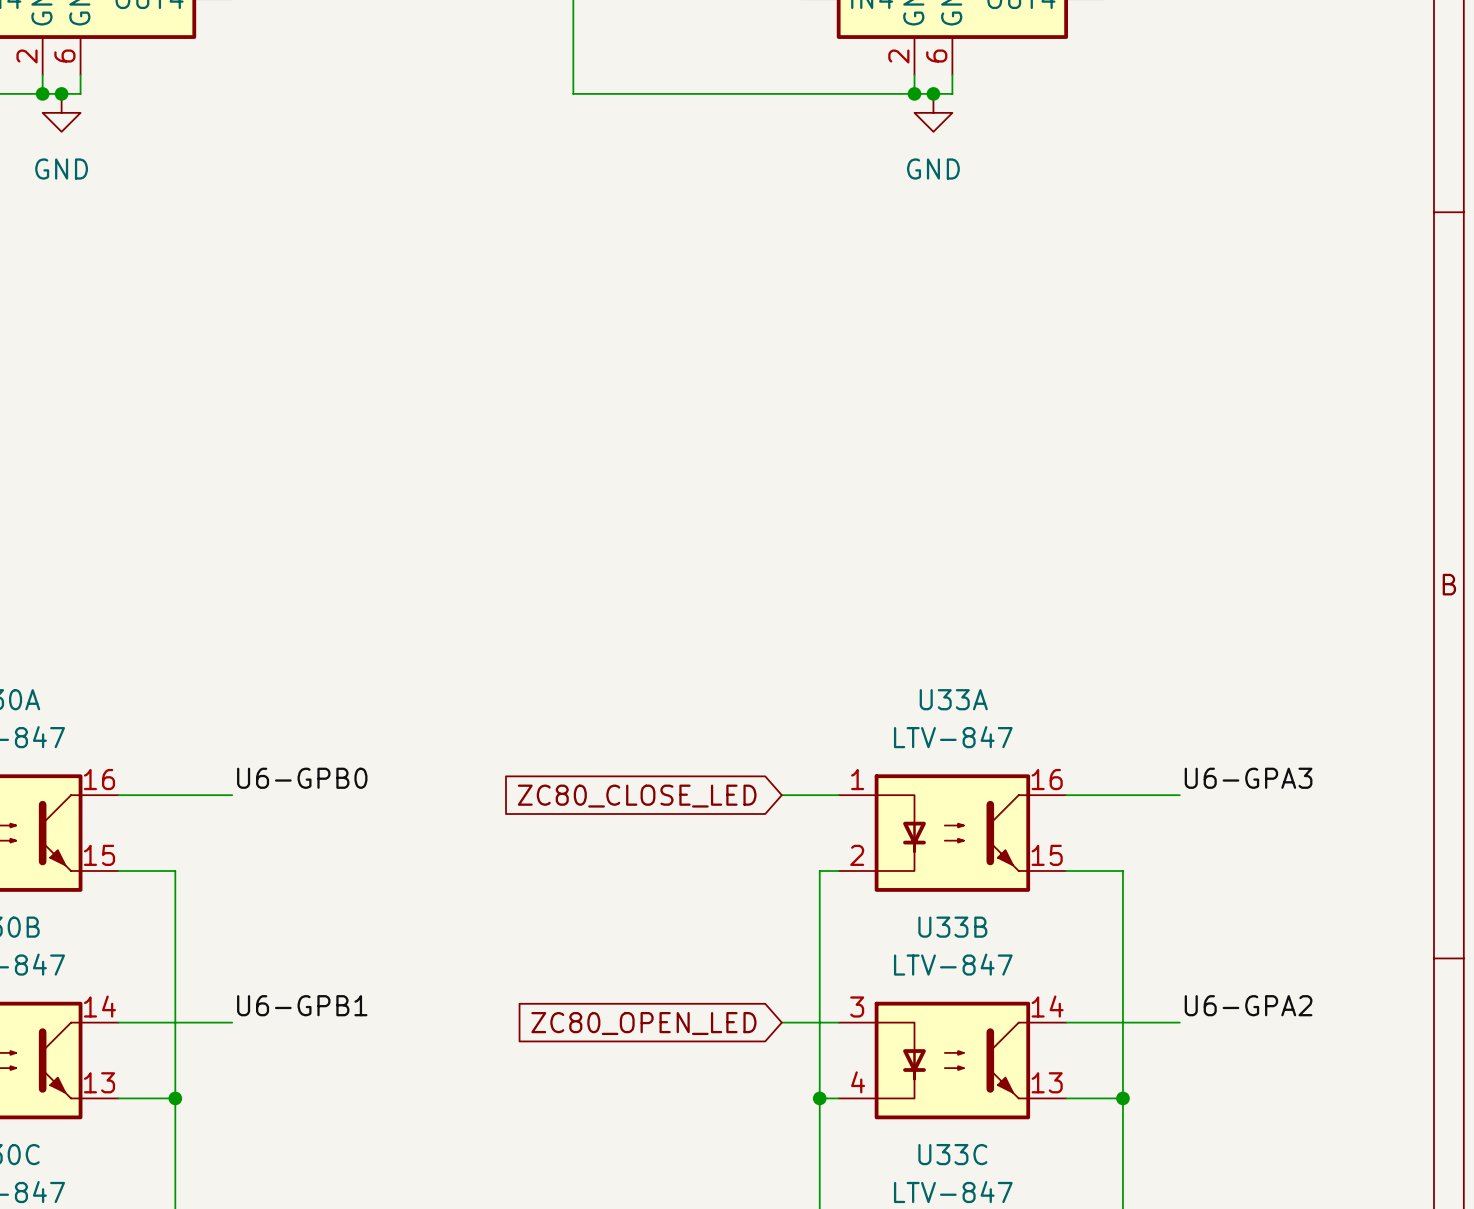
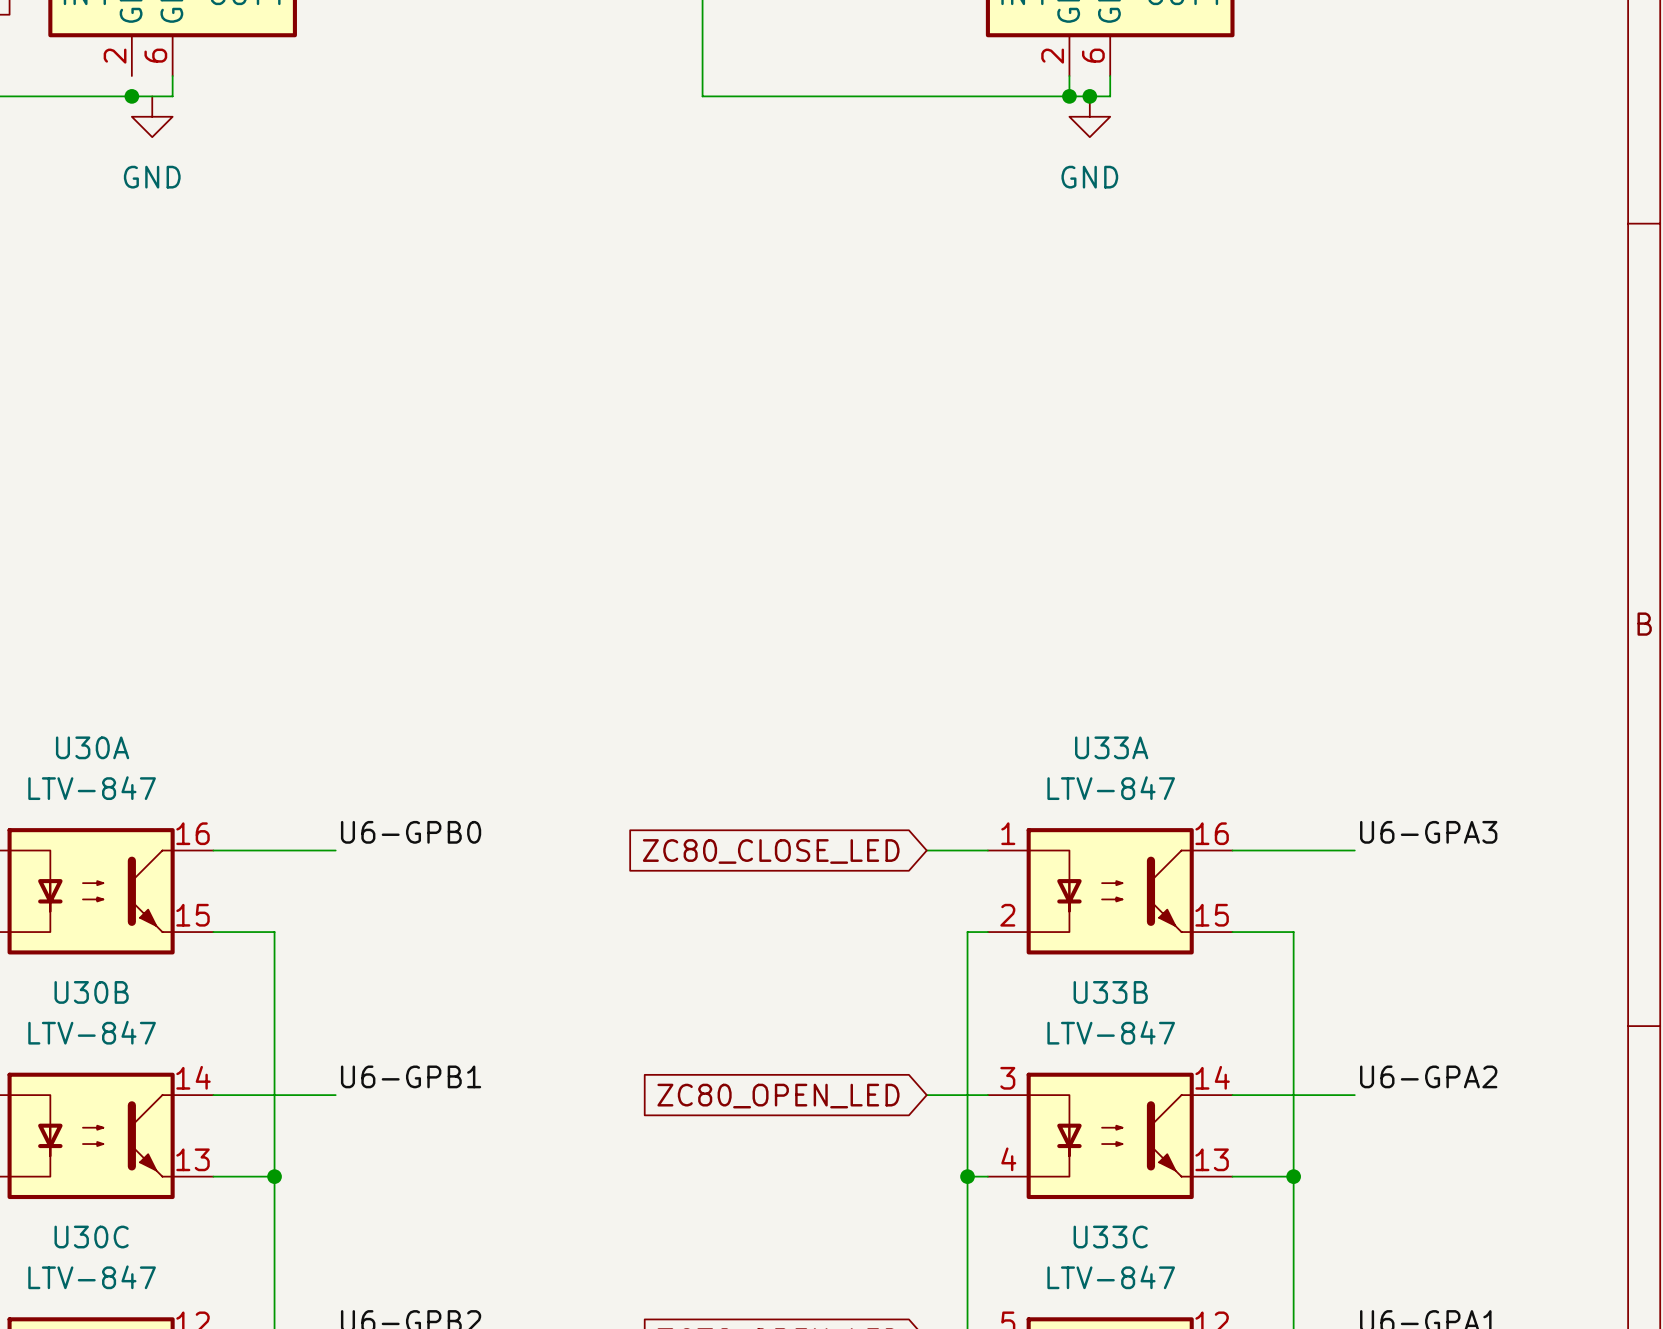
wire: (42, 74) (42, 93) -> none
junction: (61, 93) -> none

